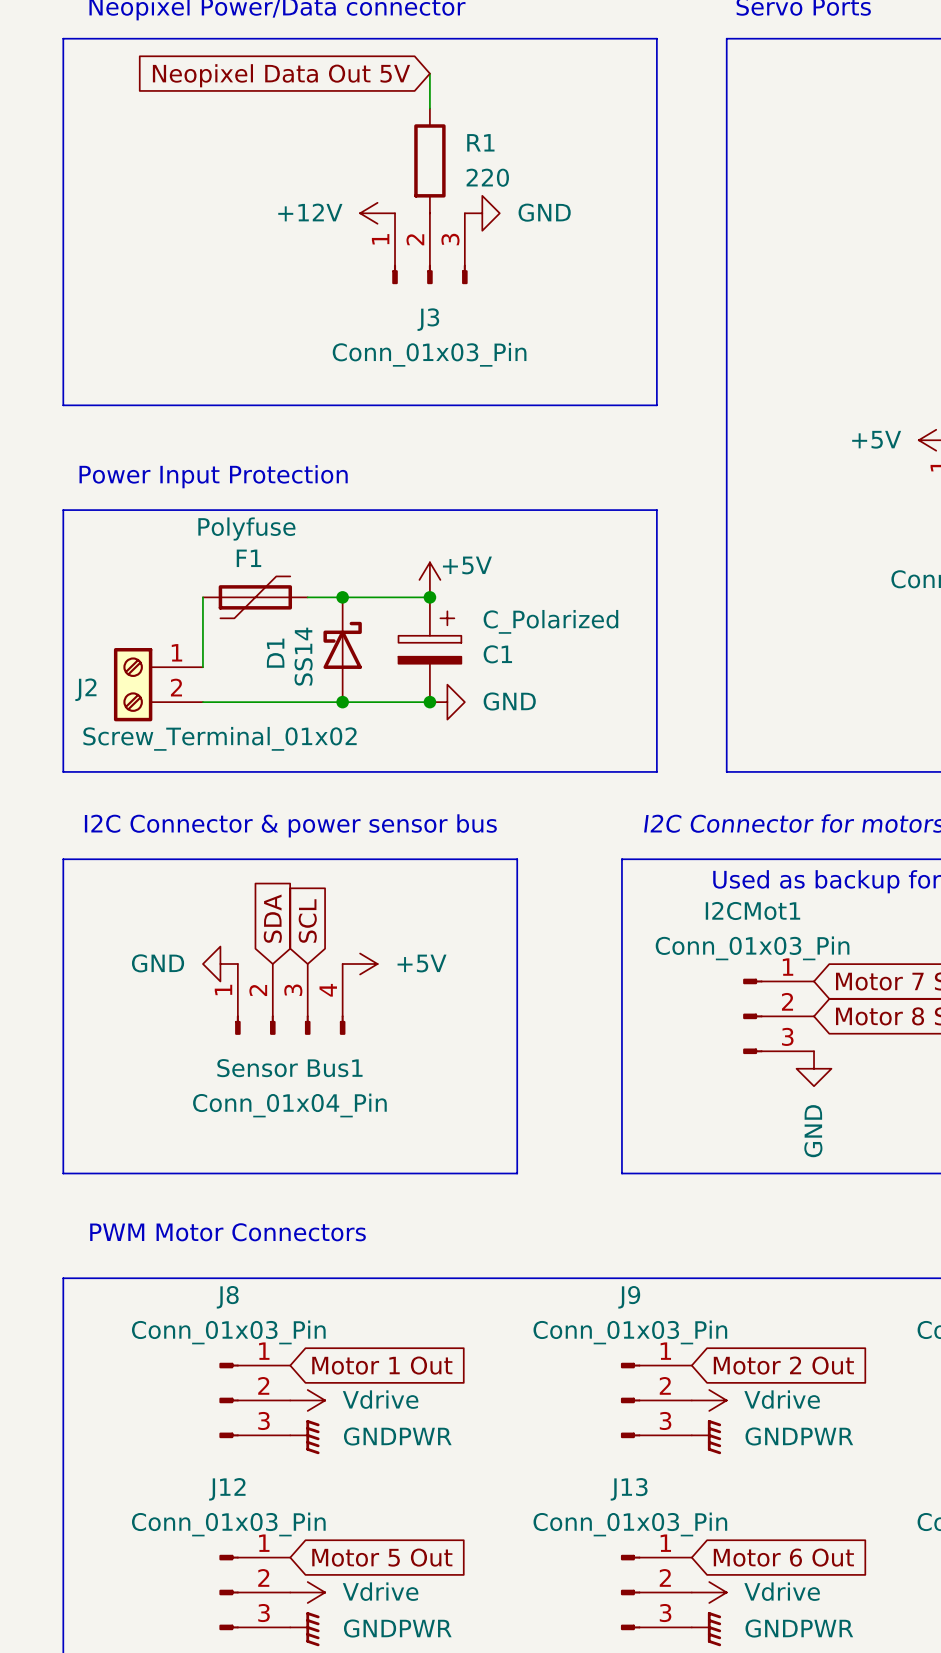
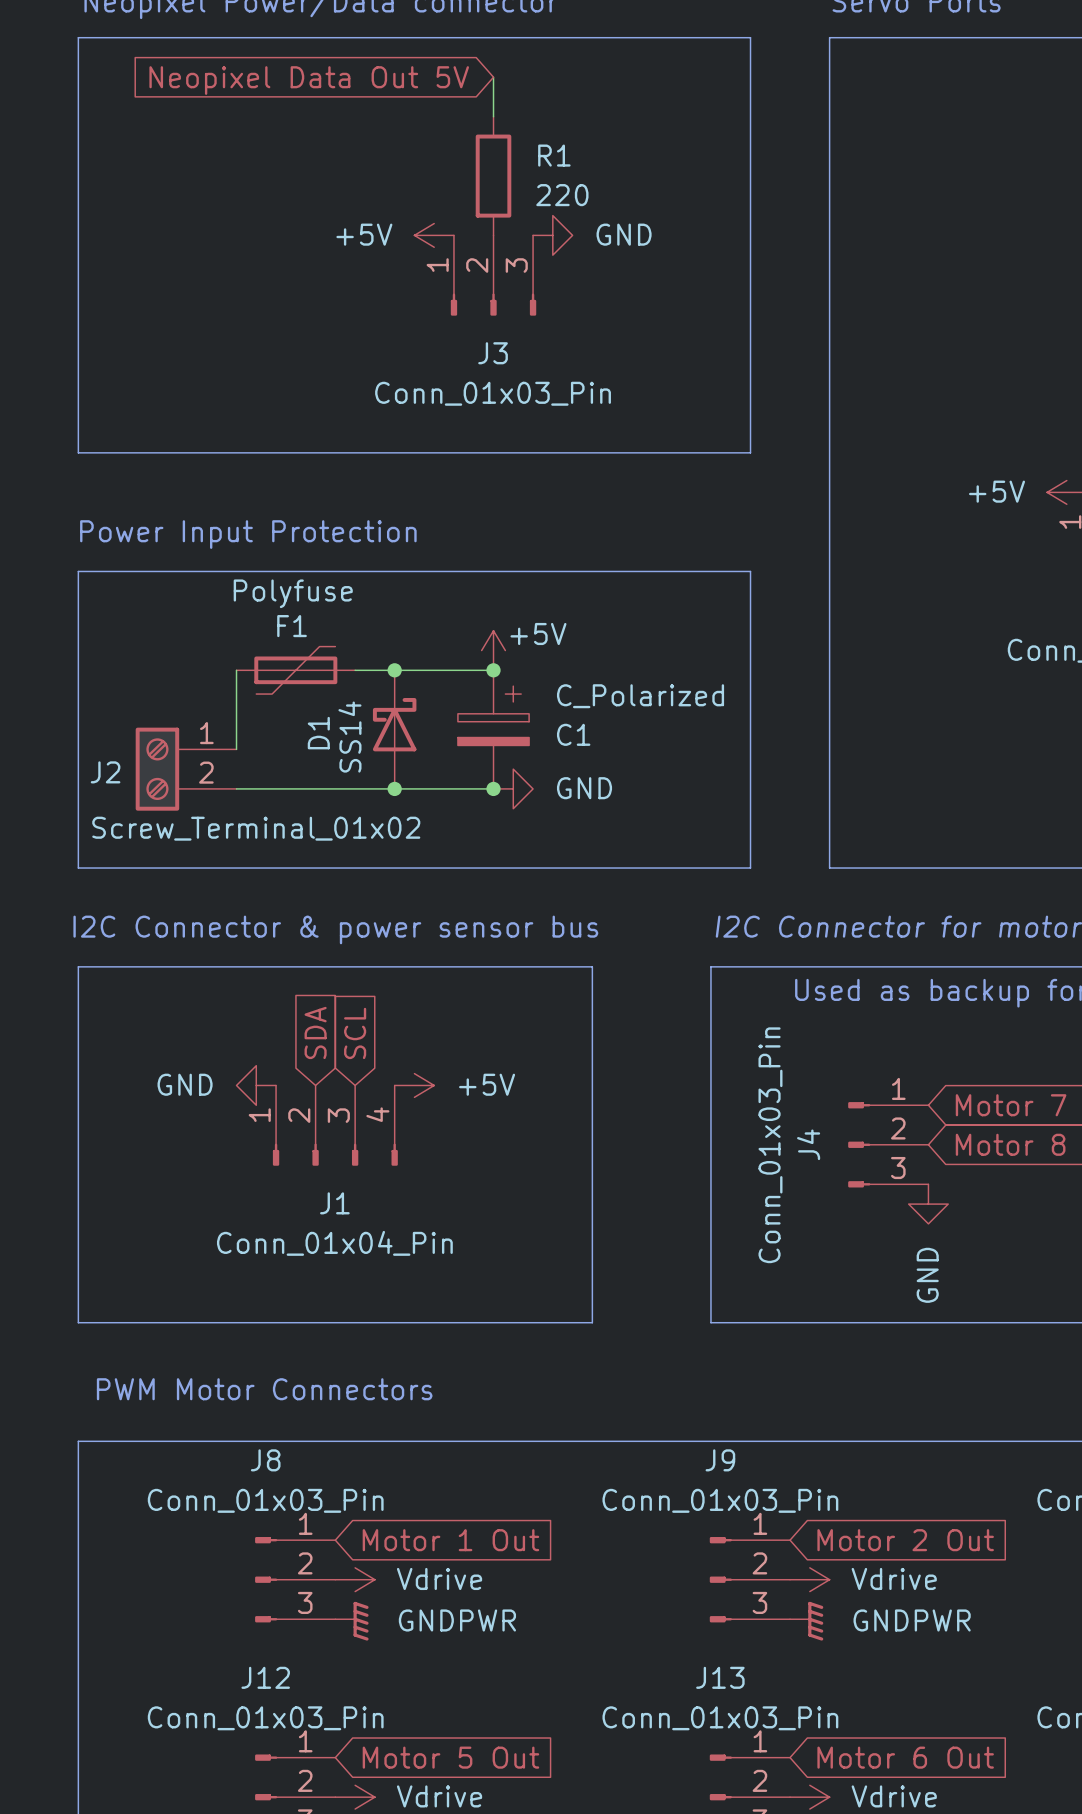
power symbol: +12V (377, 213) -> +5V (434, 235)
I2CMot1 name: I2CMot1 (752, 910) -> J4 (808, 1144)
I2CMot1 value rotation: 0° (752, 948) -> 90° counterclockwise (770, 1145)
Sensor Bus1 name: Sensor Bus1 (289, 1068) -> J1 (334, 1203)

